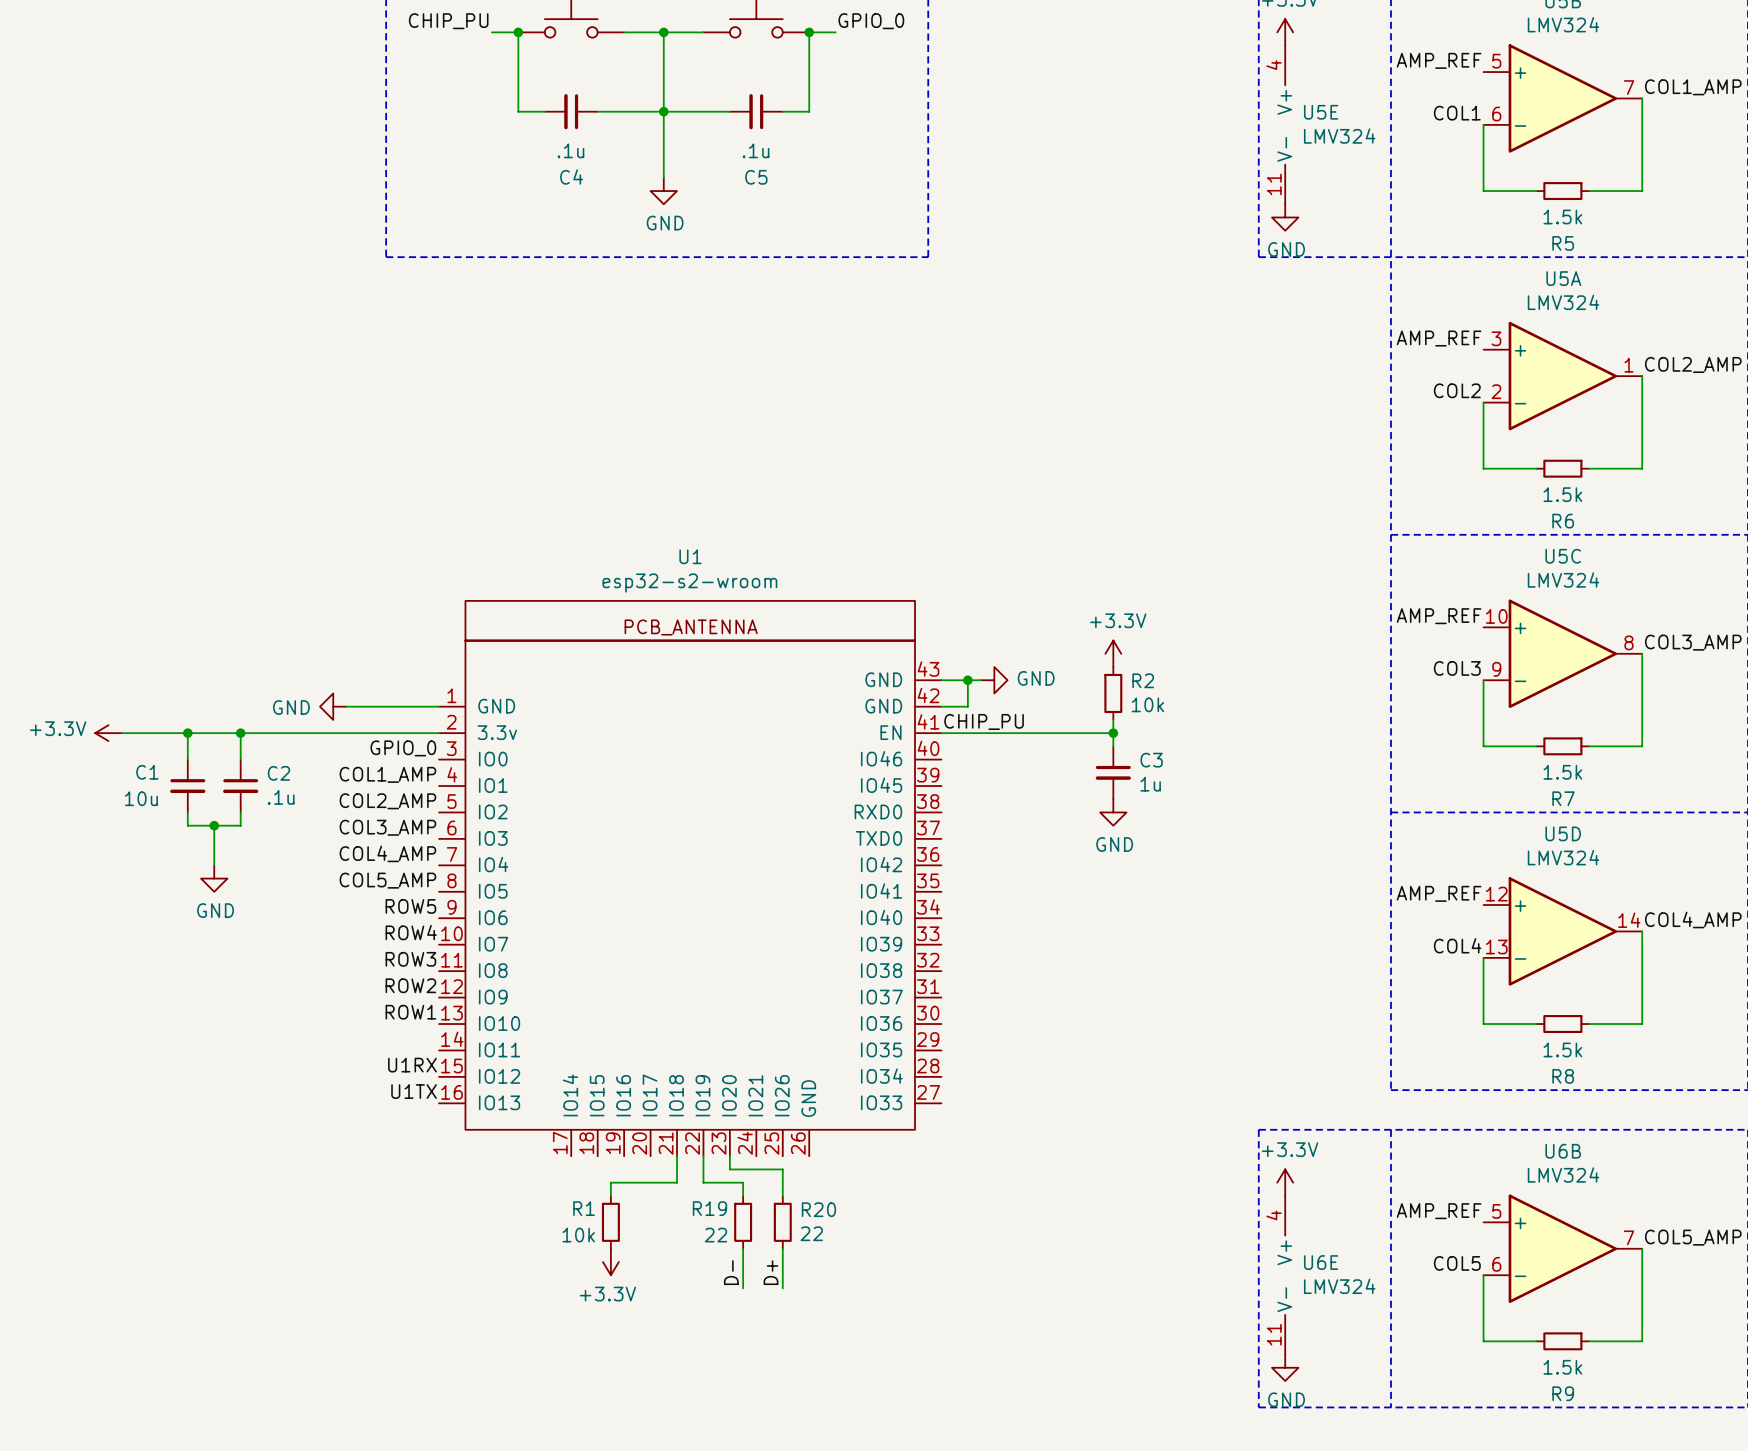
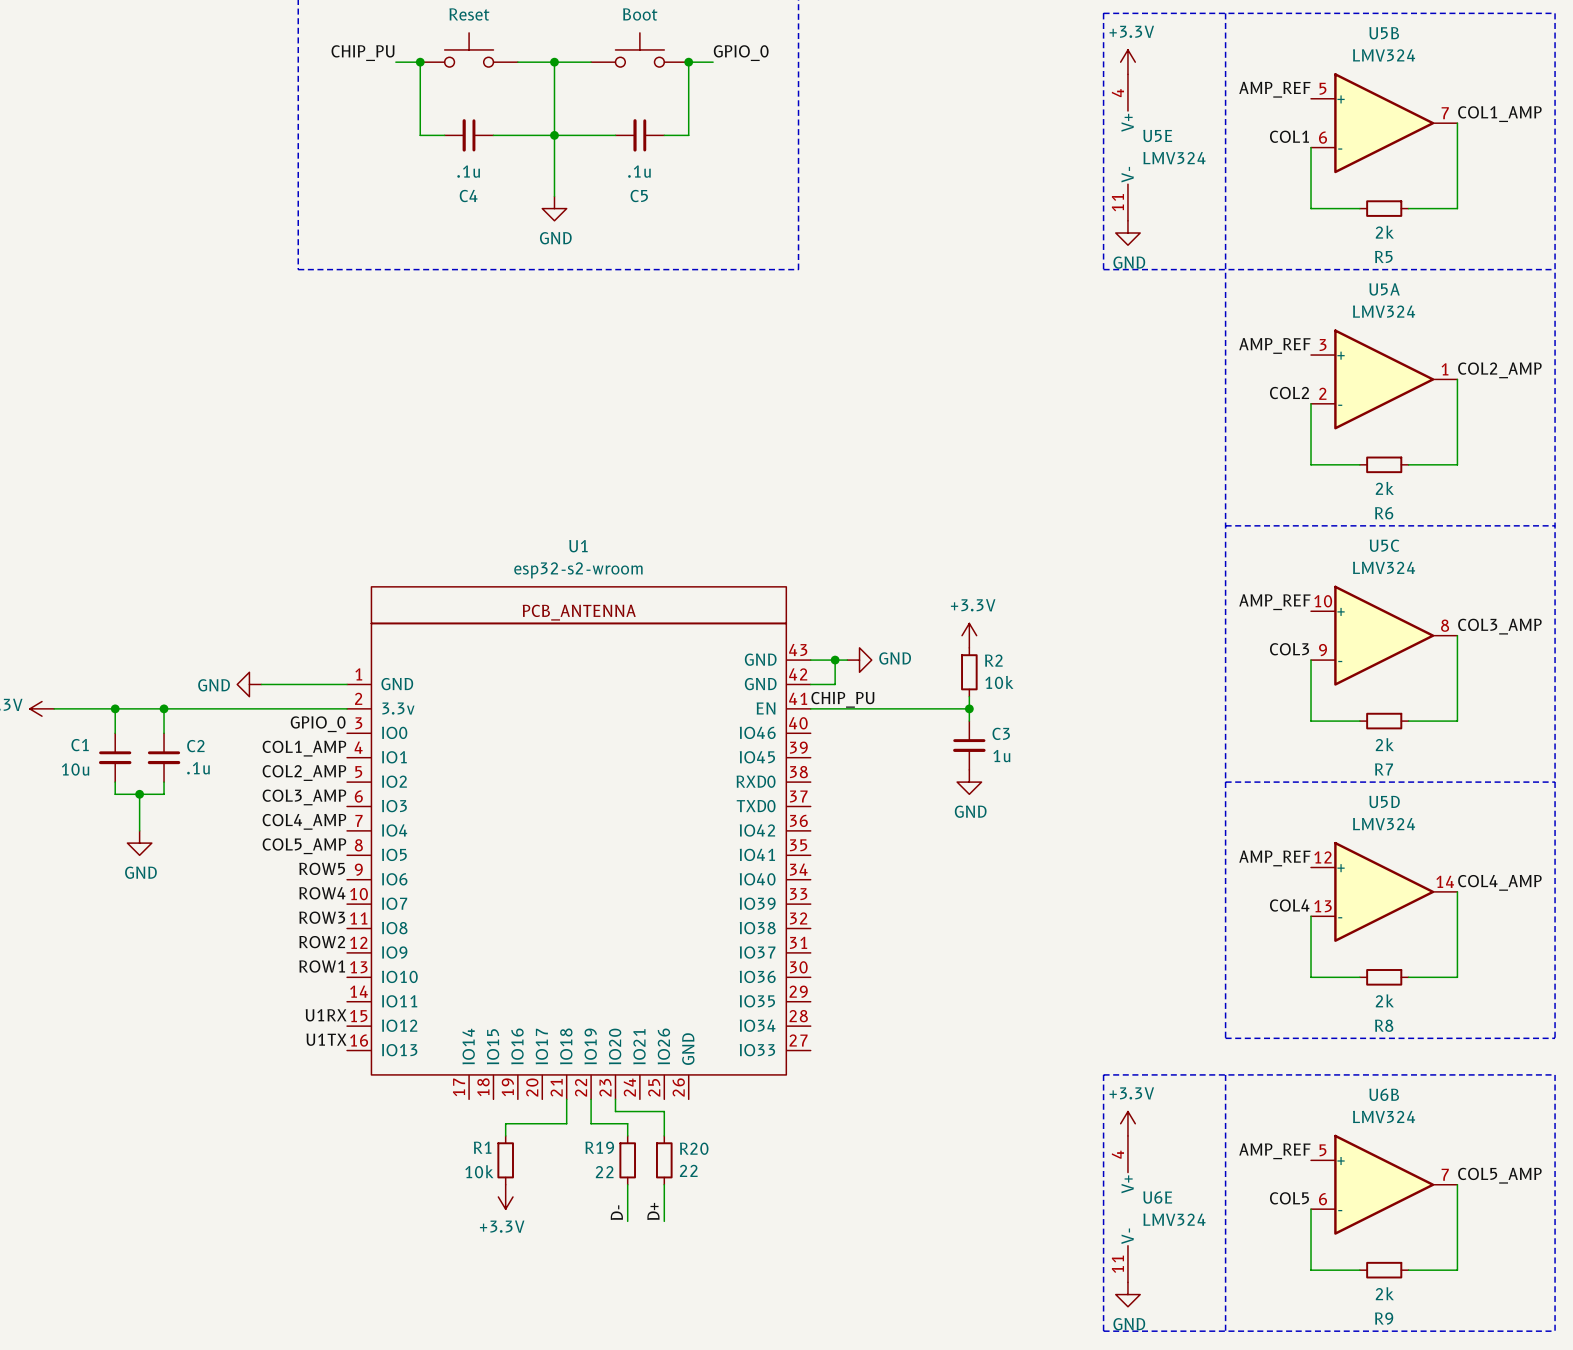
R5 value: 1.5k (1562, 216) -> 2k (1384, 232)
R6 value: 1.5k (1562, 494) -> 2k (1384, 488)
R7 value: 1.5k (1562, 772) -> 2k (1384, 744)
R8 value: 1.5k (1562, 1049) -> 2k (1384, 1000)
R9 value: 1.5k (1562, 1367) -> 2k (1384, 1293)

